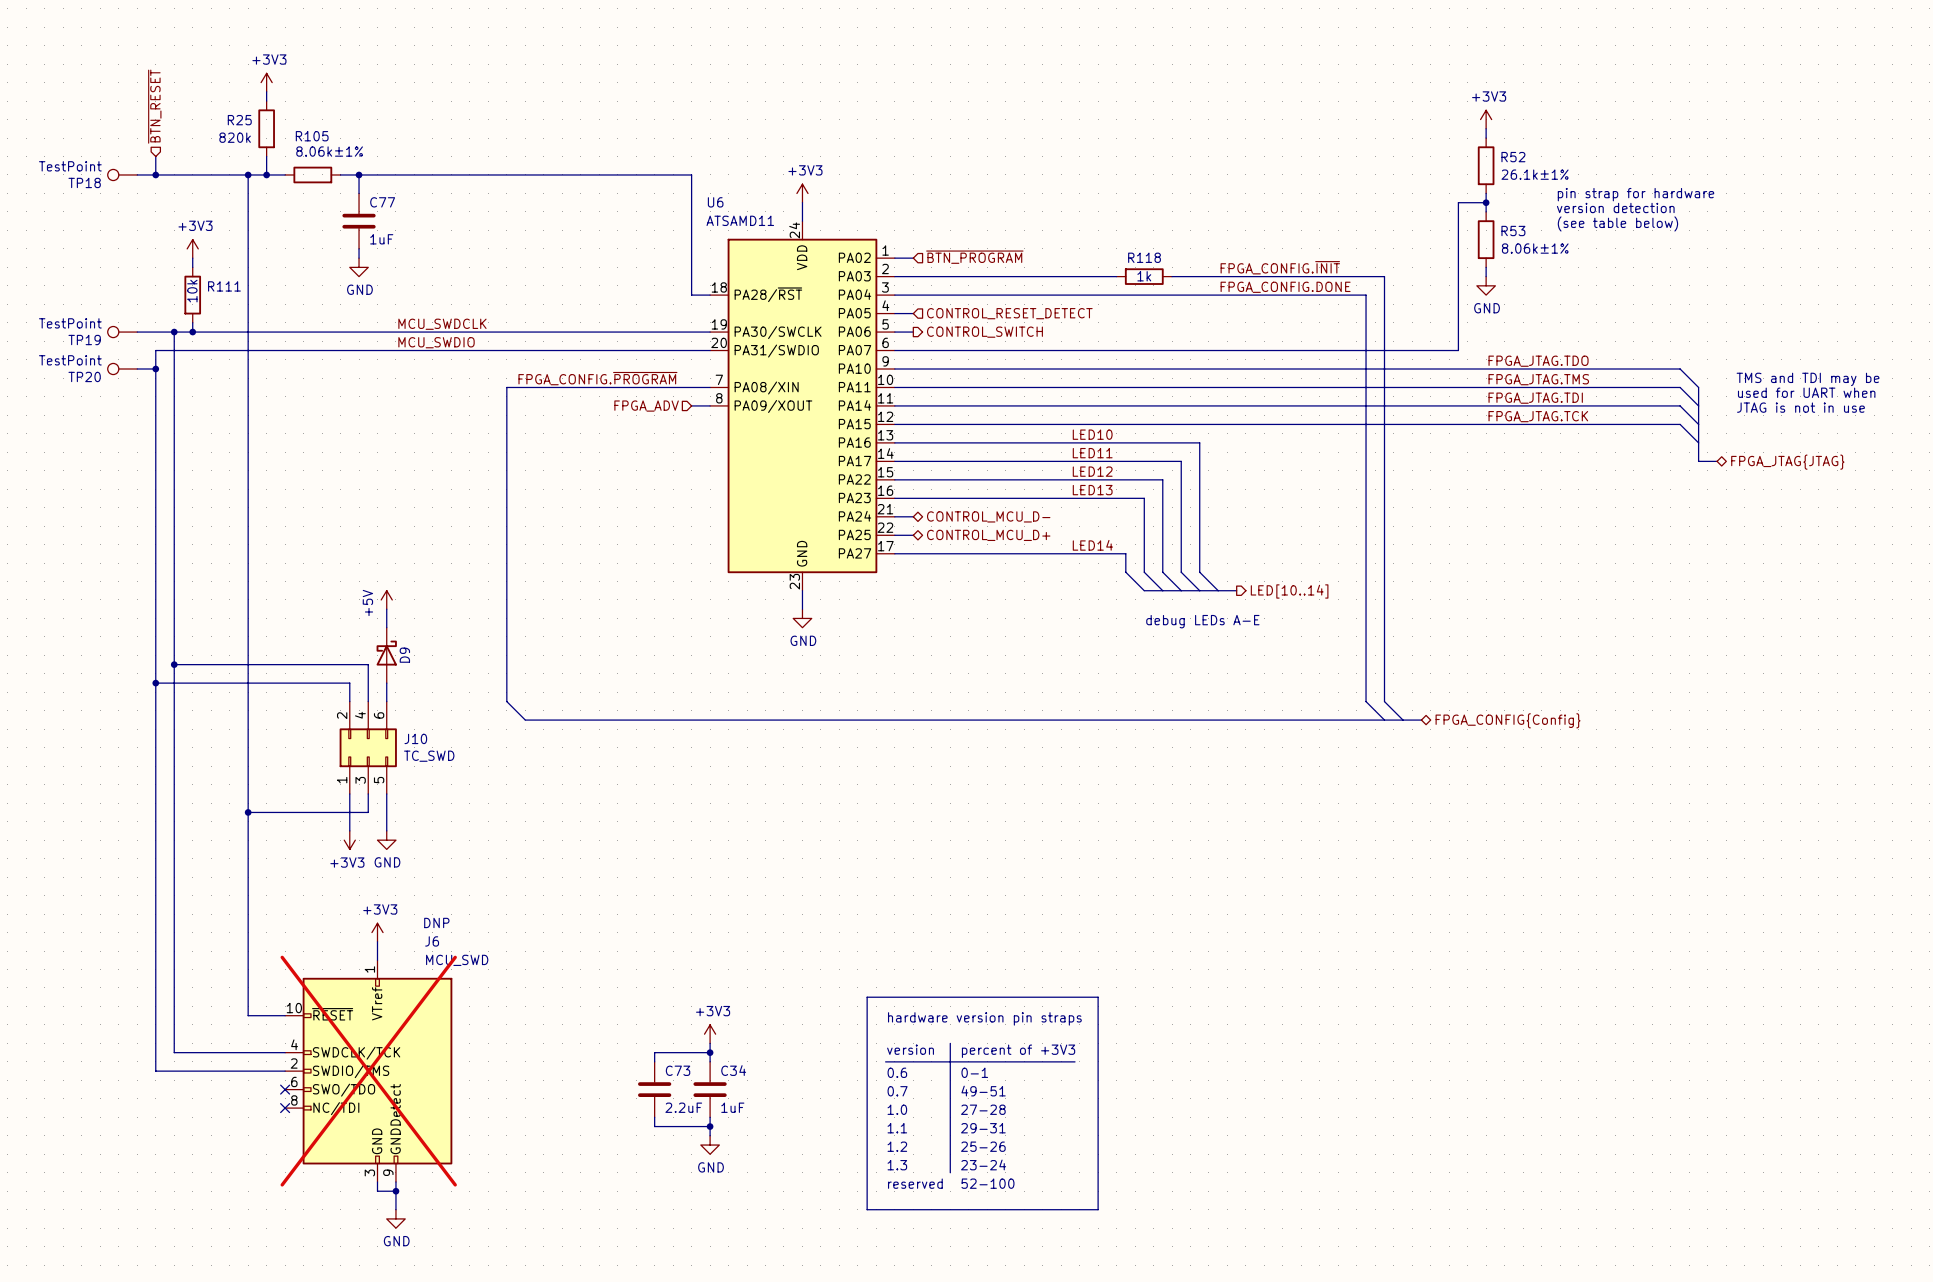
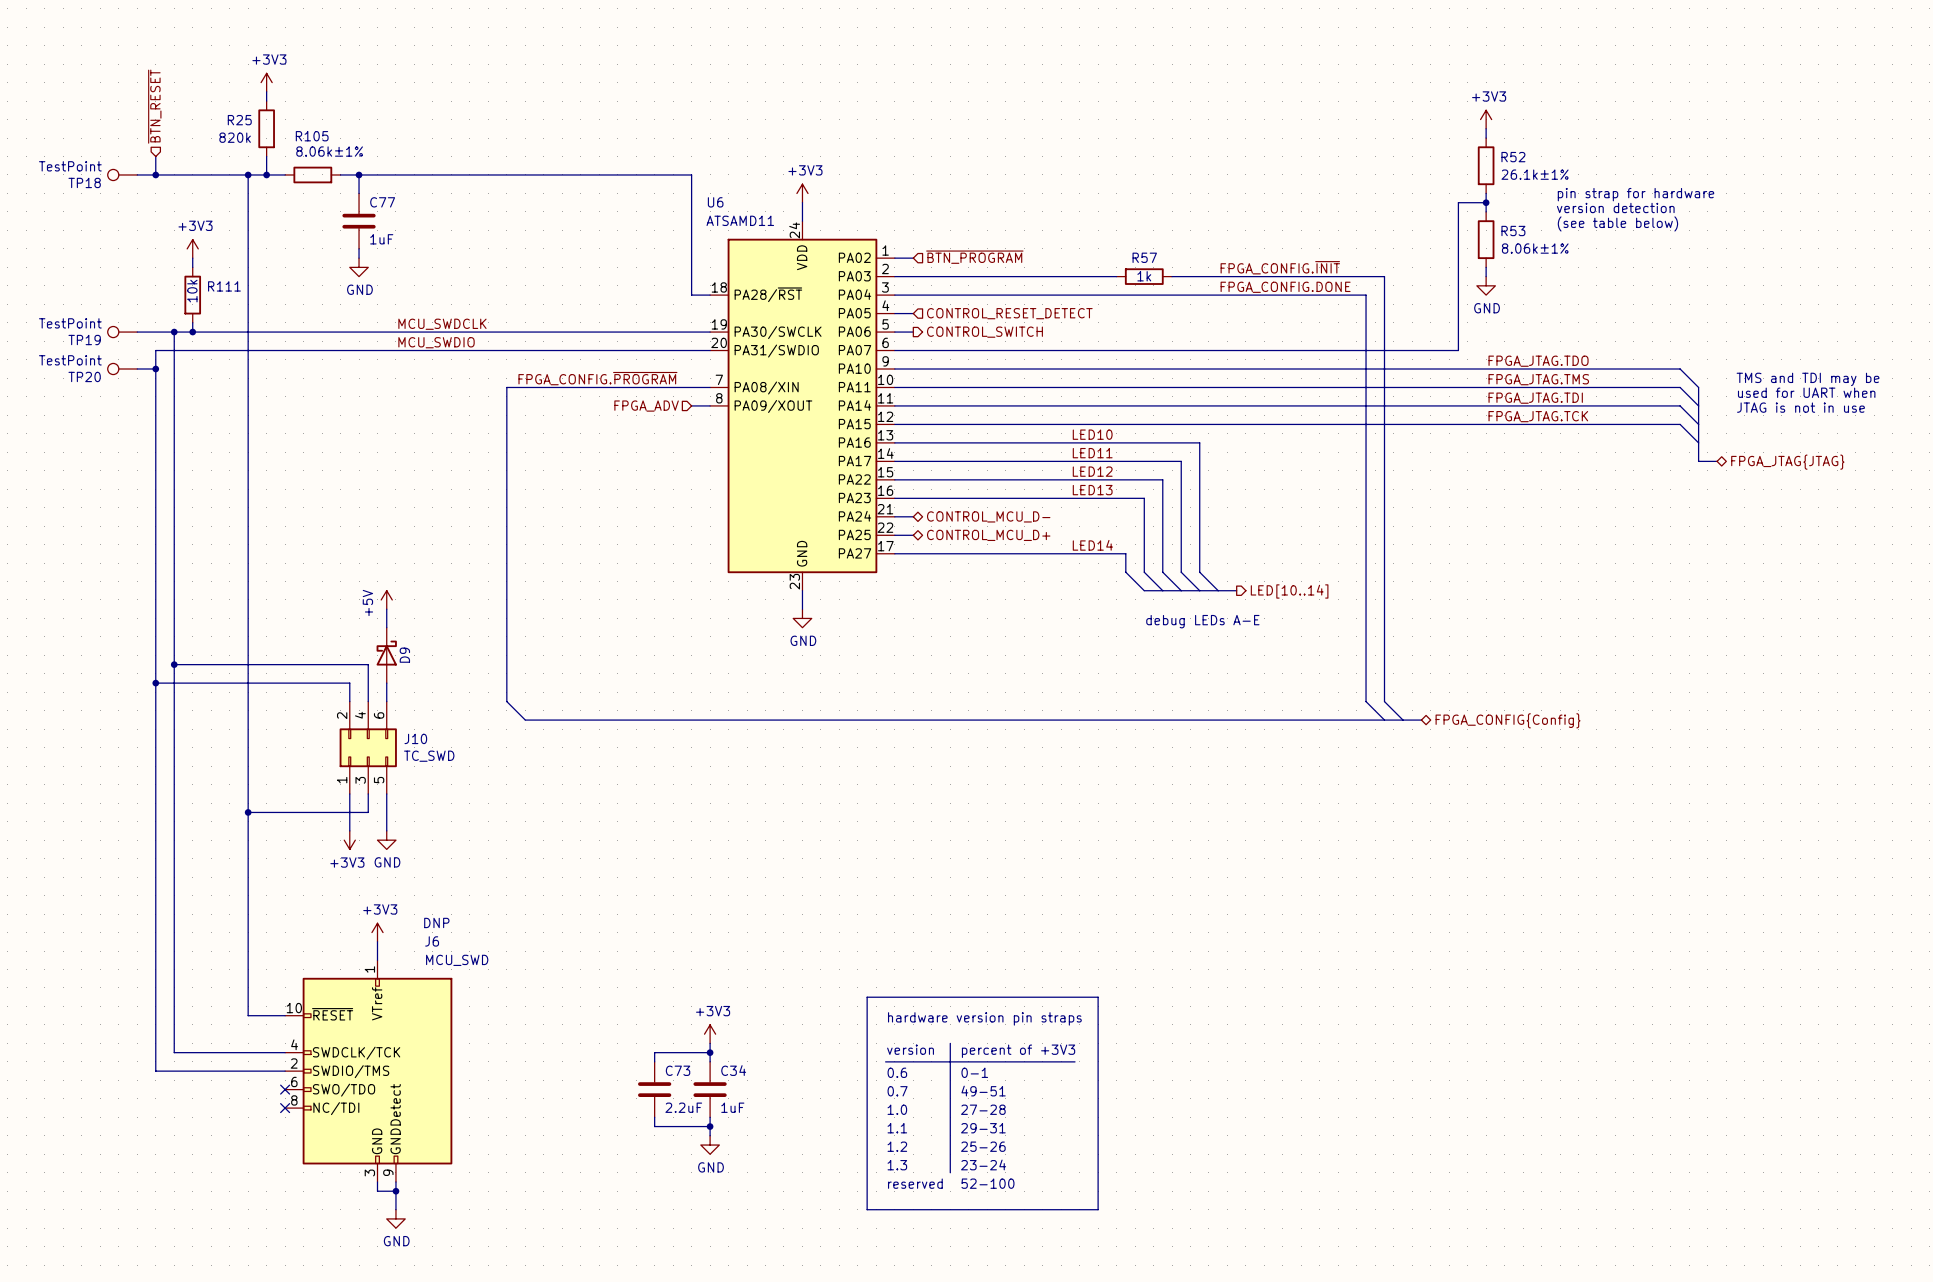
R118 name: R118 (1144, 257) -> R57 (1144, 257)
J6 do-not-place cross: (368, 1071) -> none

